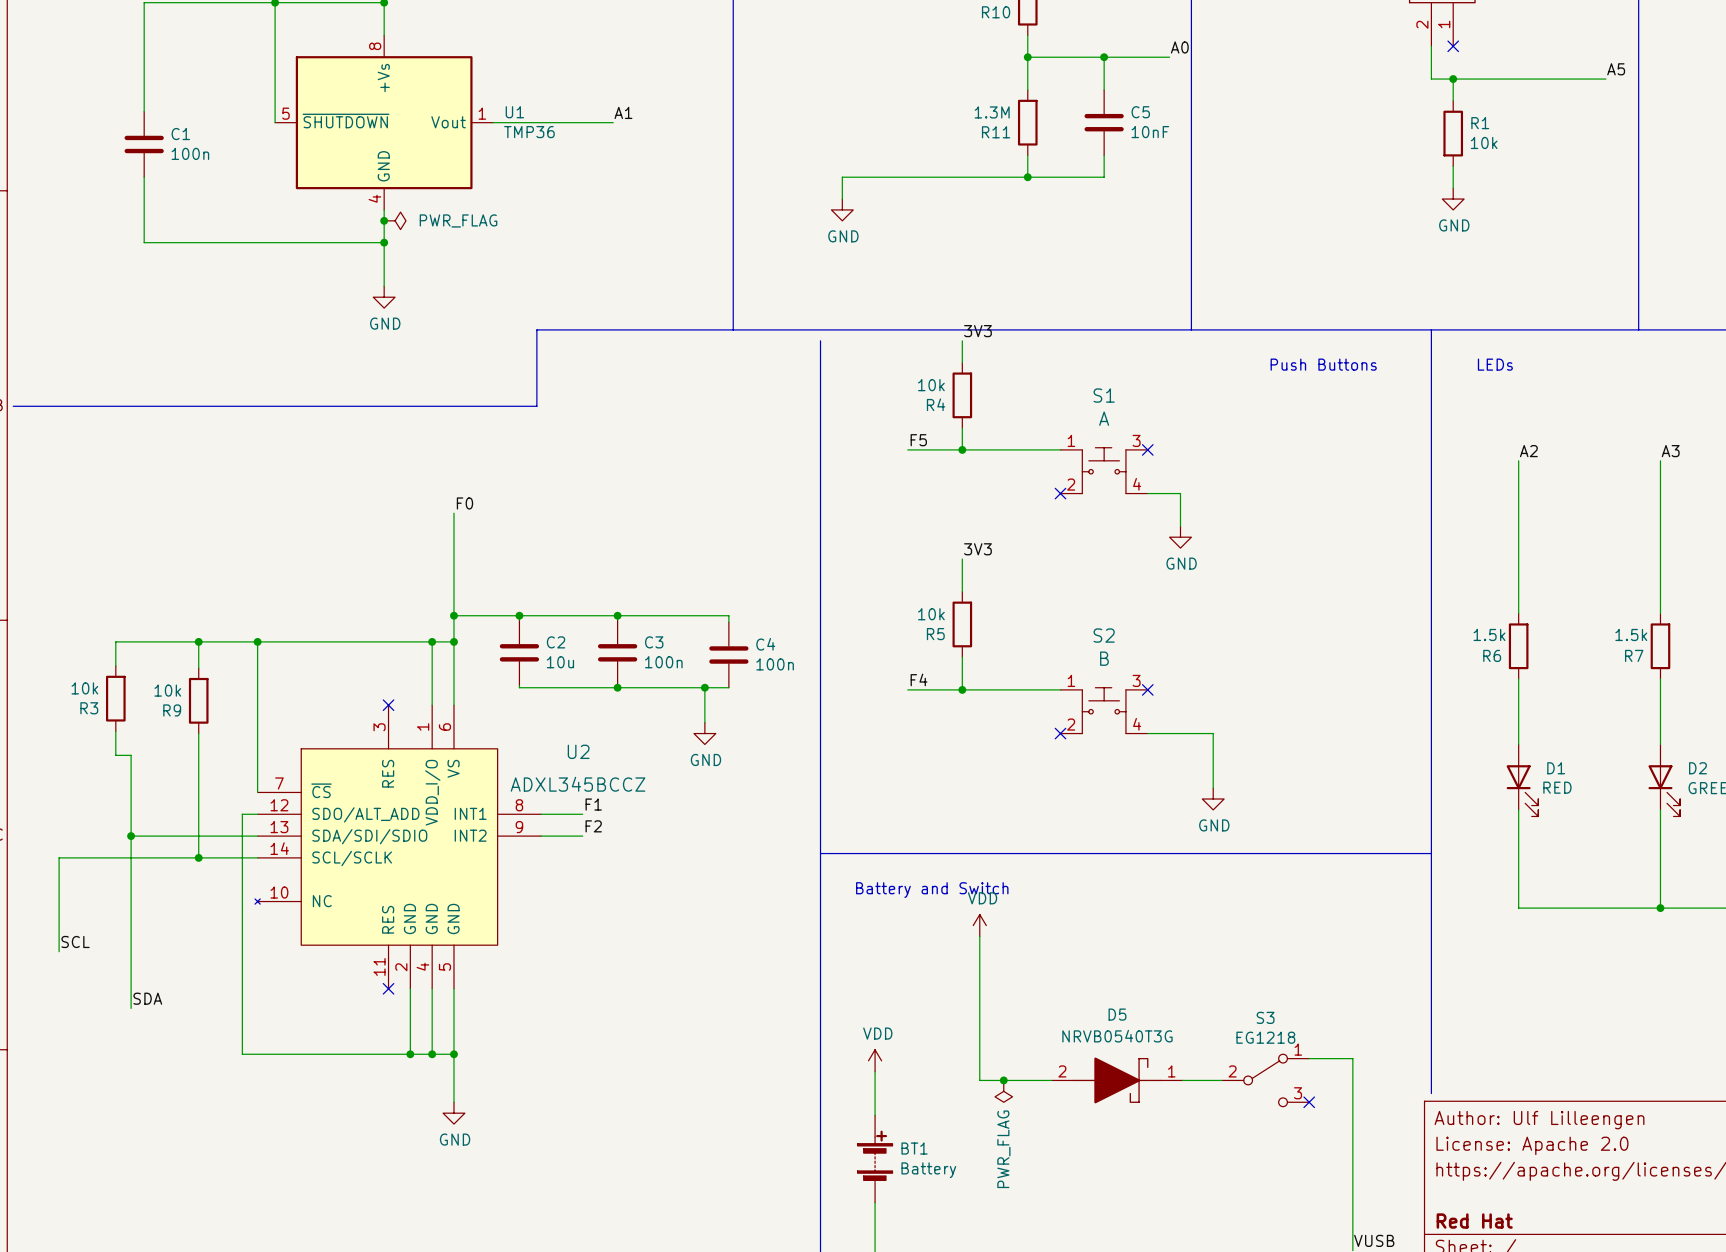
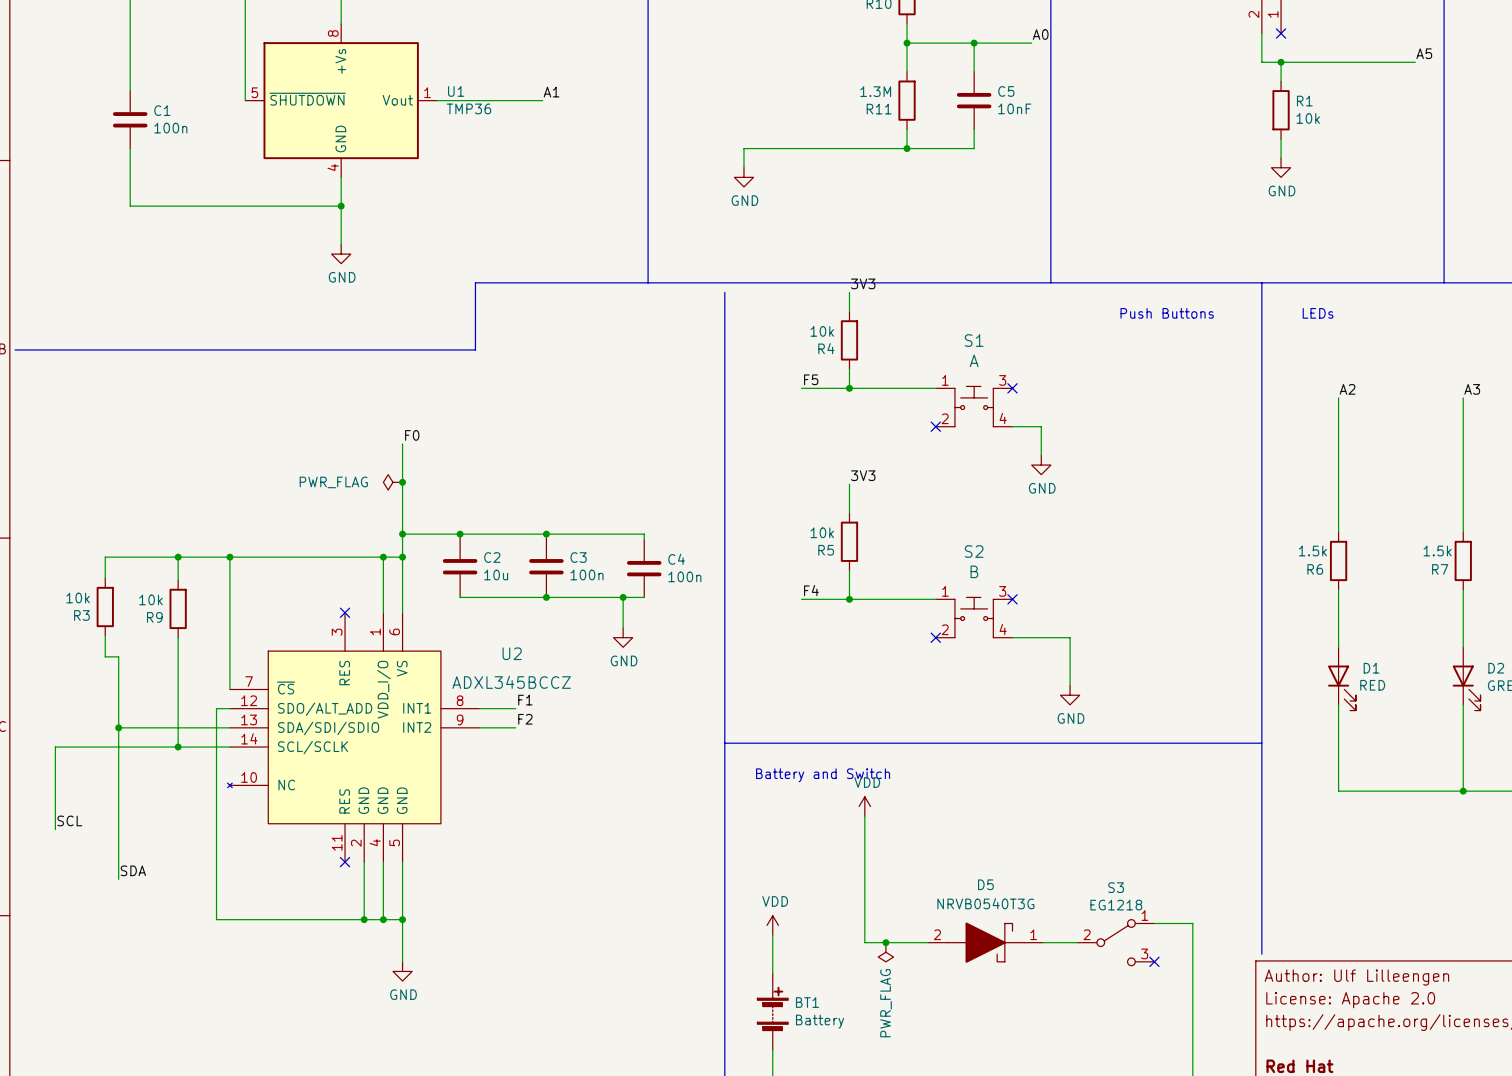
junction: (384, 220) -> none
power symbol: PWR_FLAG (395, 220) -> none
power symbol: none -> PWR_FLAG (392, 482)
junction: none -> (402, 482)

